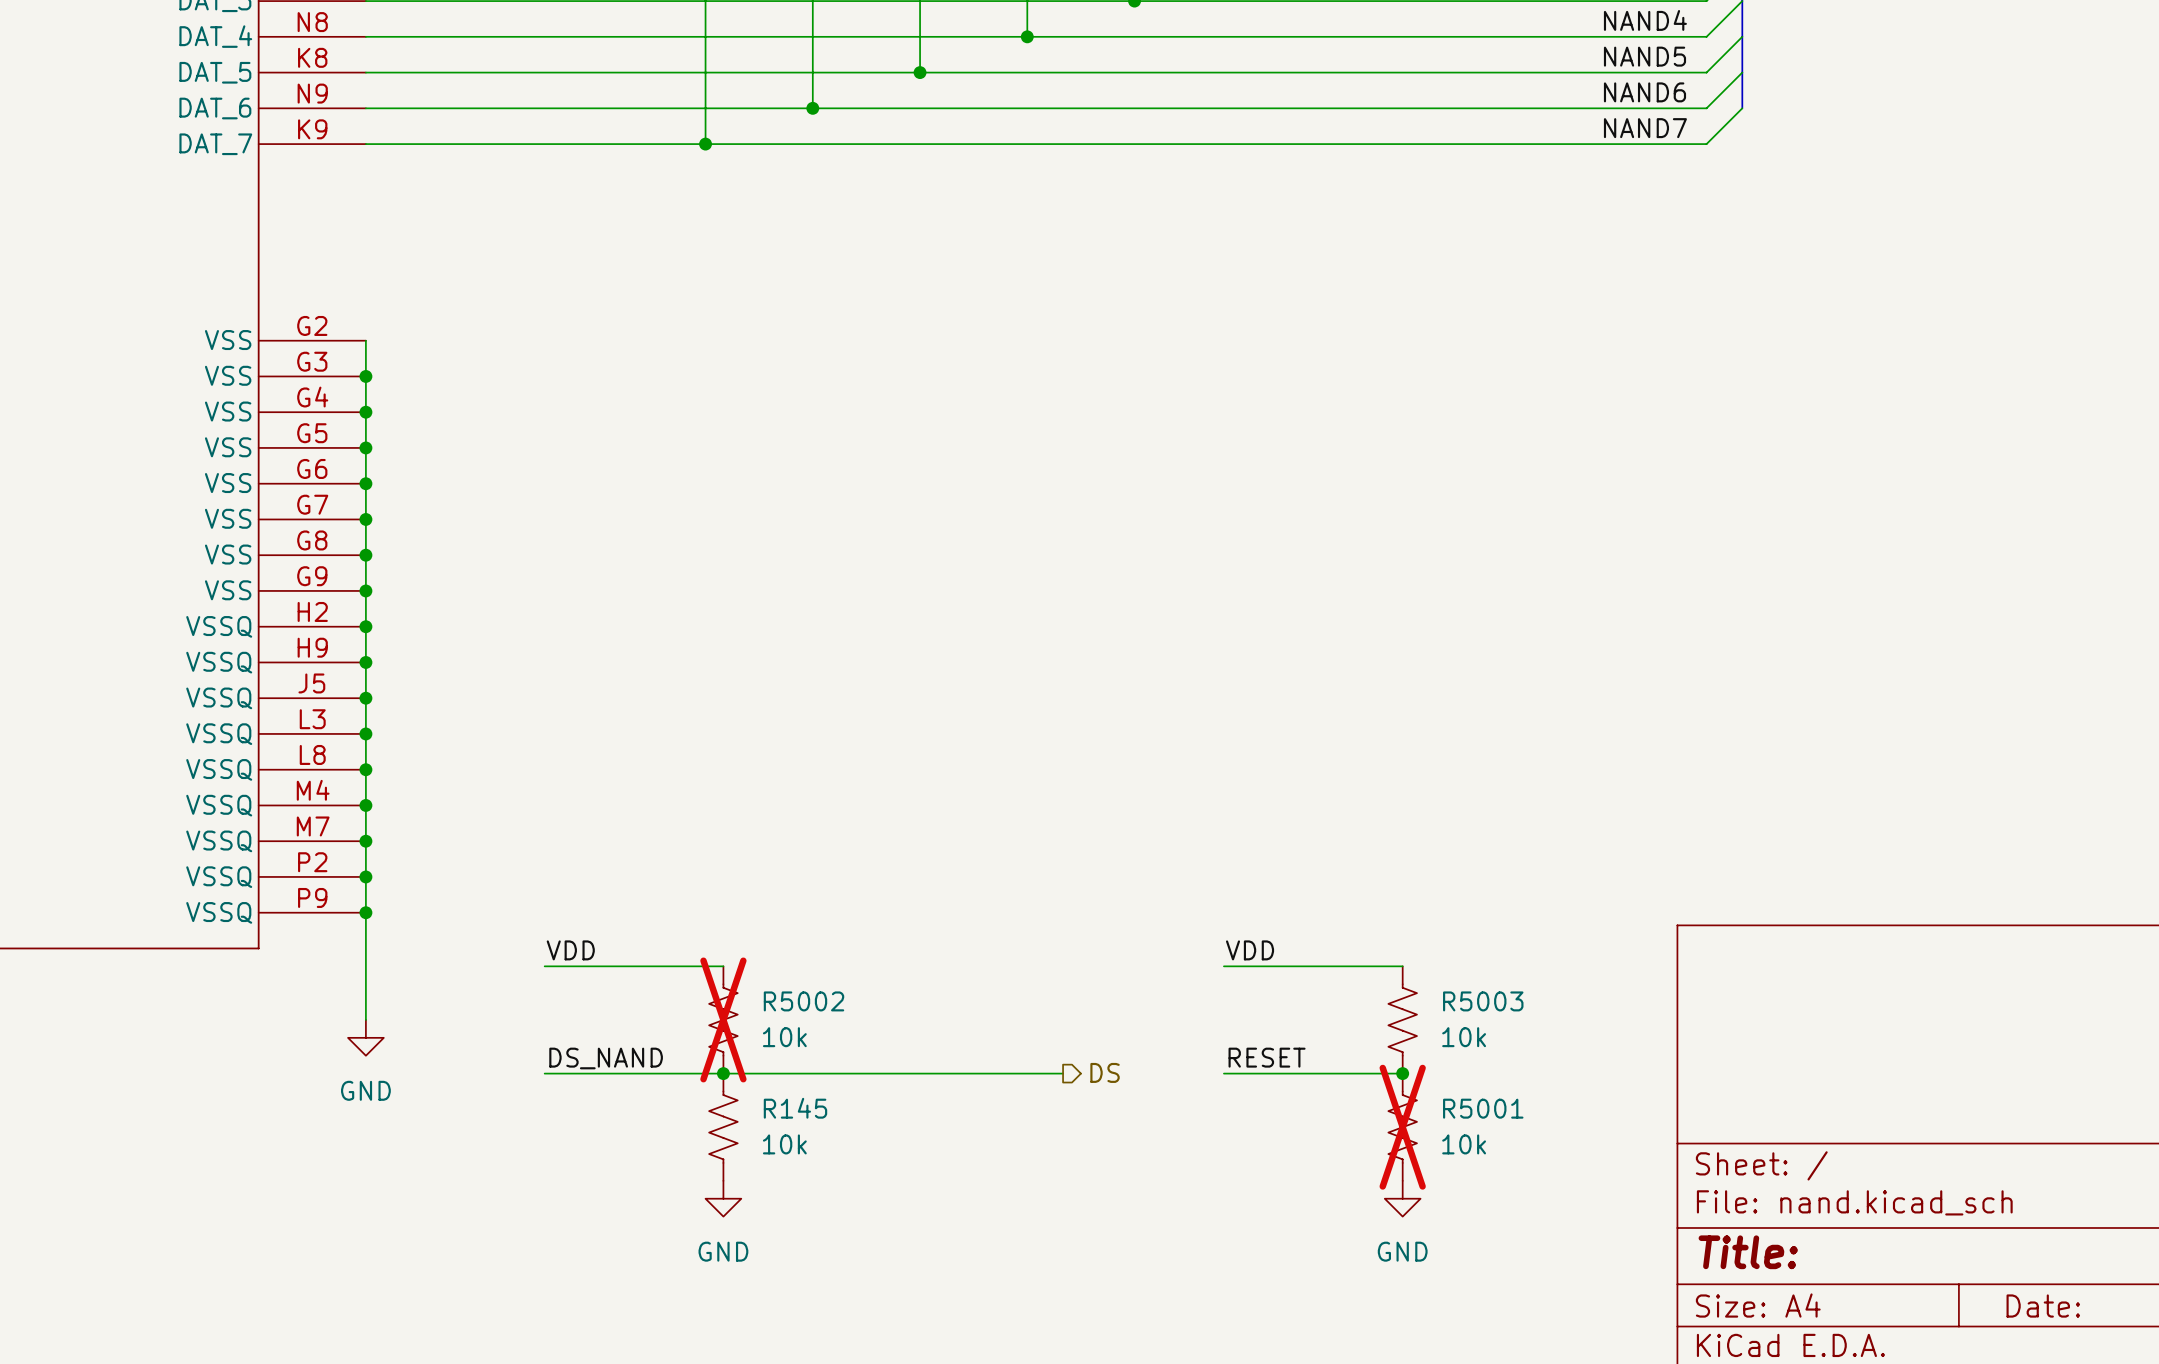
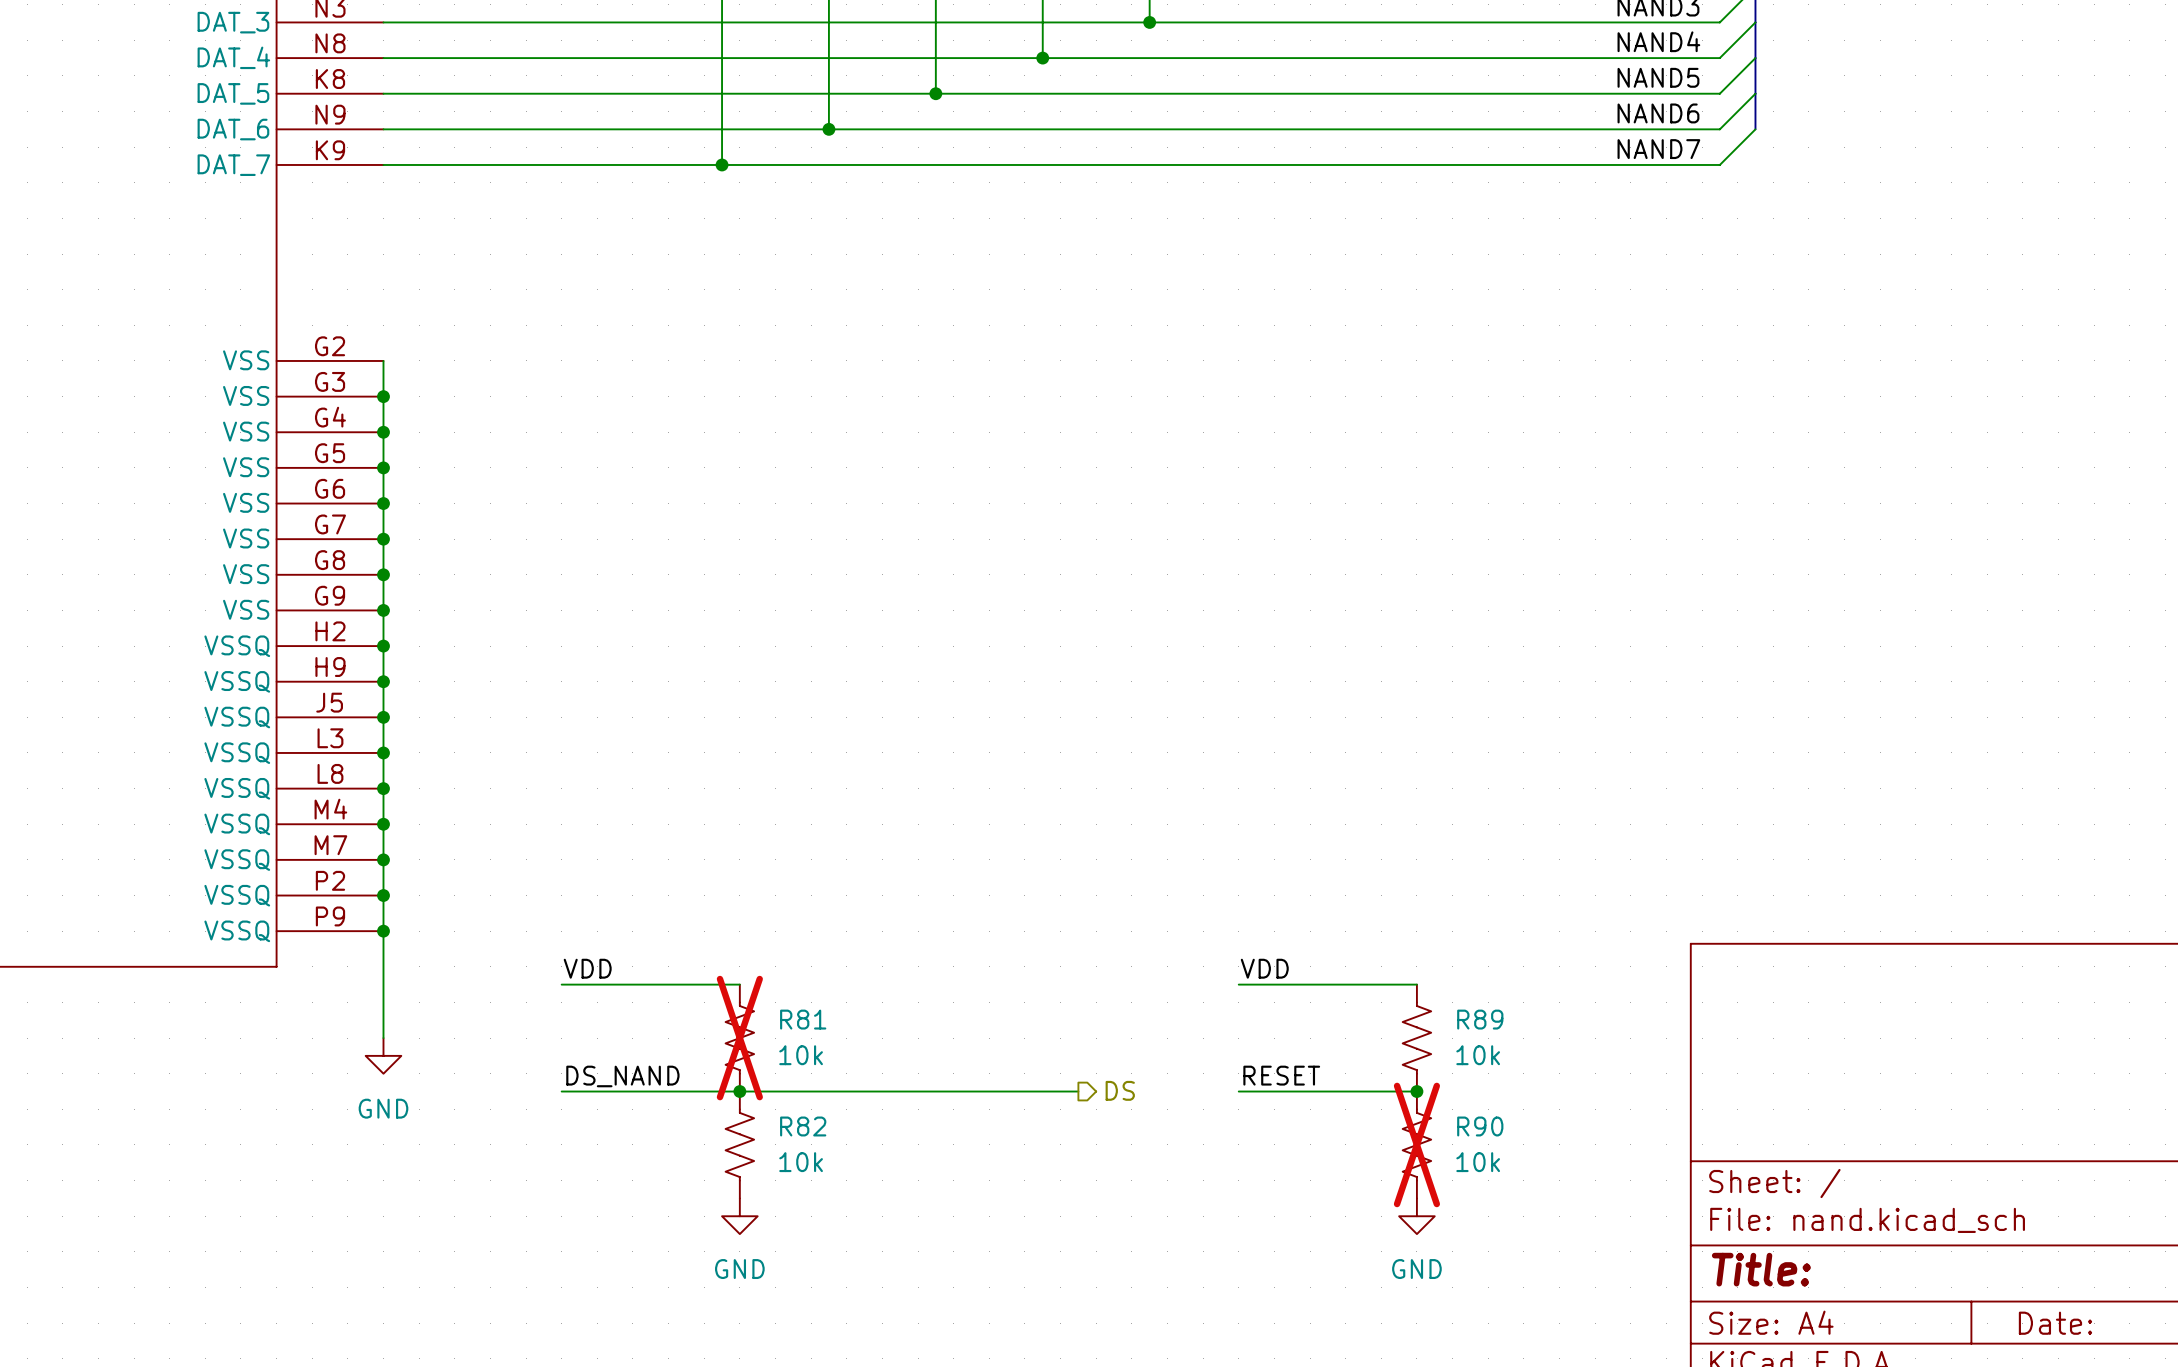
R5002 name: R5002 (804, 1001) -> R81 (803, 1019)
R5003 name: R5003 (1483, 1001) -> R89 (1480, 1019)
R145 name: R145 (795, 1108) -> R82 (803, 1126)
R5001 name: R5001 (1483, 1108) -> R90 (1480, 1126)

